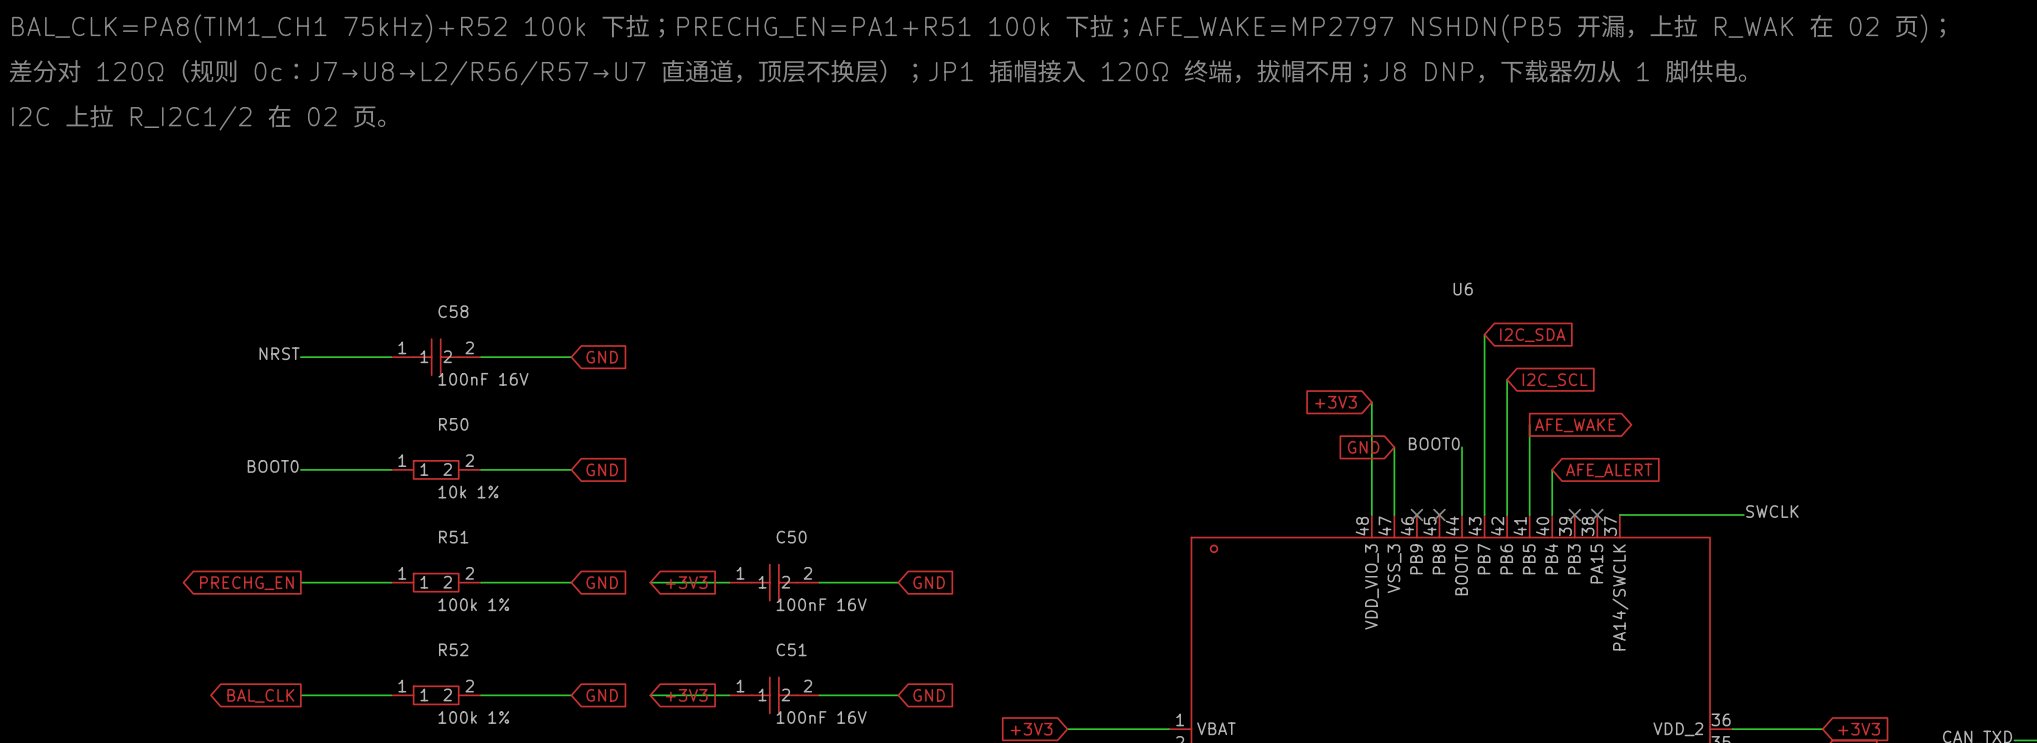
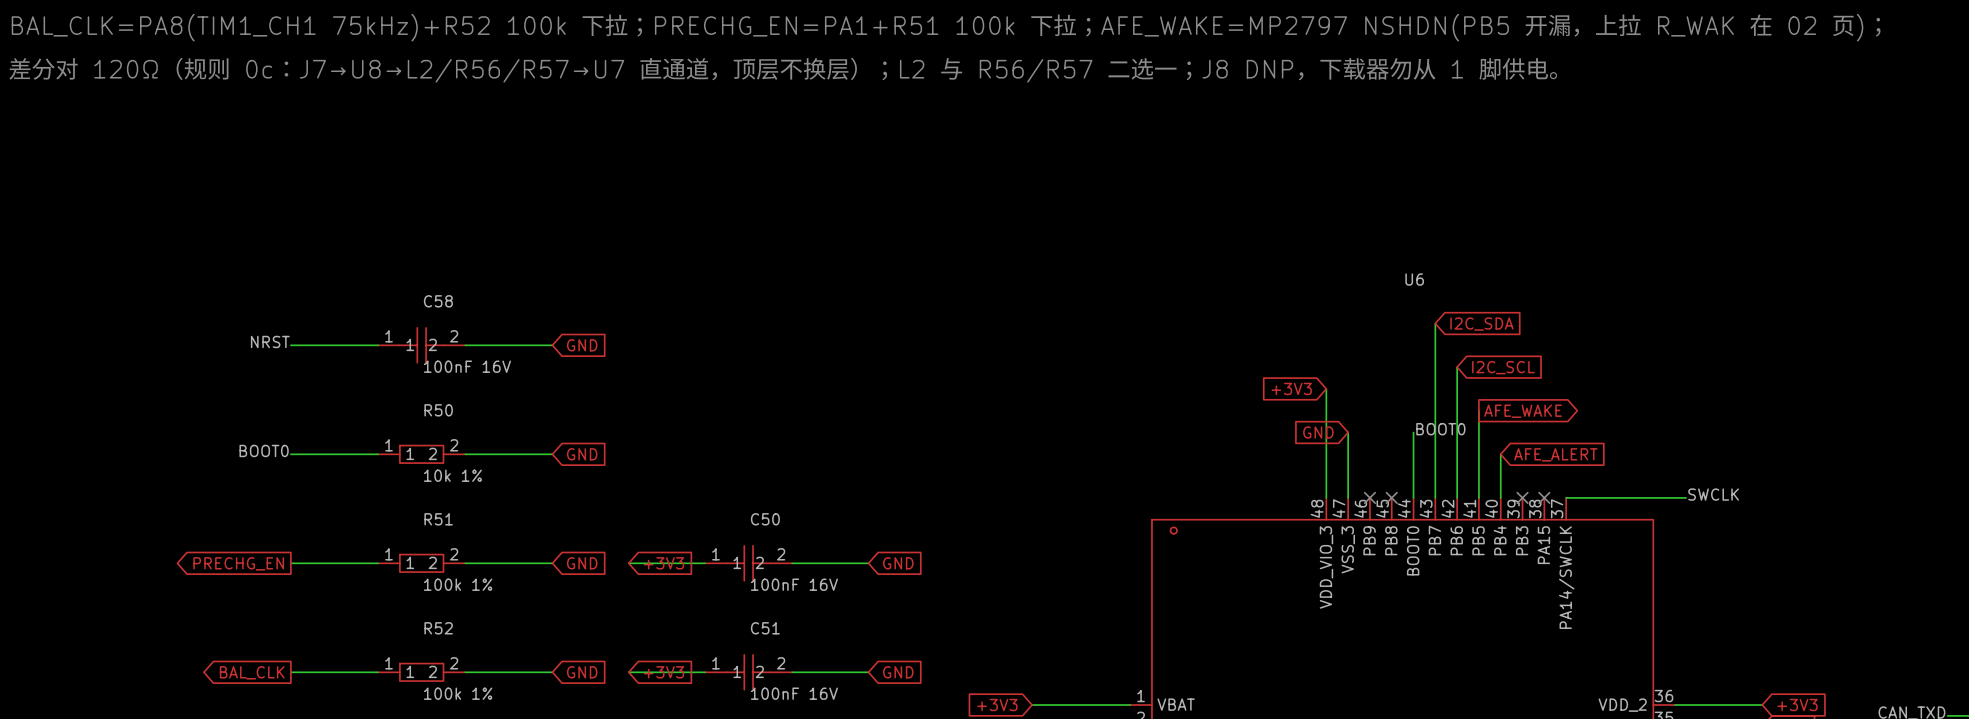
text: 差分对 120Ω（规则 0c：J7→U8→L2/R56/R57→U7 直通道，顶层不换层）；JP1 插帽接入 120Ω 终端，拔帽不用；J8 DNP，下载器勿从 1 脚供电。 (877, 72) -> 差分对 120Ω（规则 0c：J7→U8→L2/R56/R57→U7 直通道，顶层不换层）；L2 与 R56/R57 二选一；J8 DNP，下载器勿从 1 脚供电。 (783, 69)
text: I2C 上拉 R_I2C1/2 在 02 页。 (199, 117) -> none
label position: BOOT0 (1434, 443) -> BOOT0 (1440, 429)

